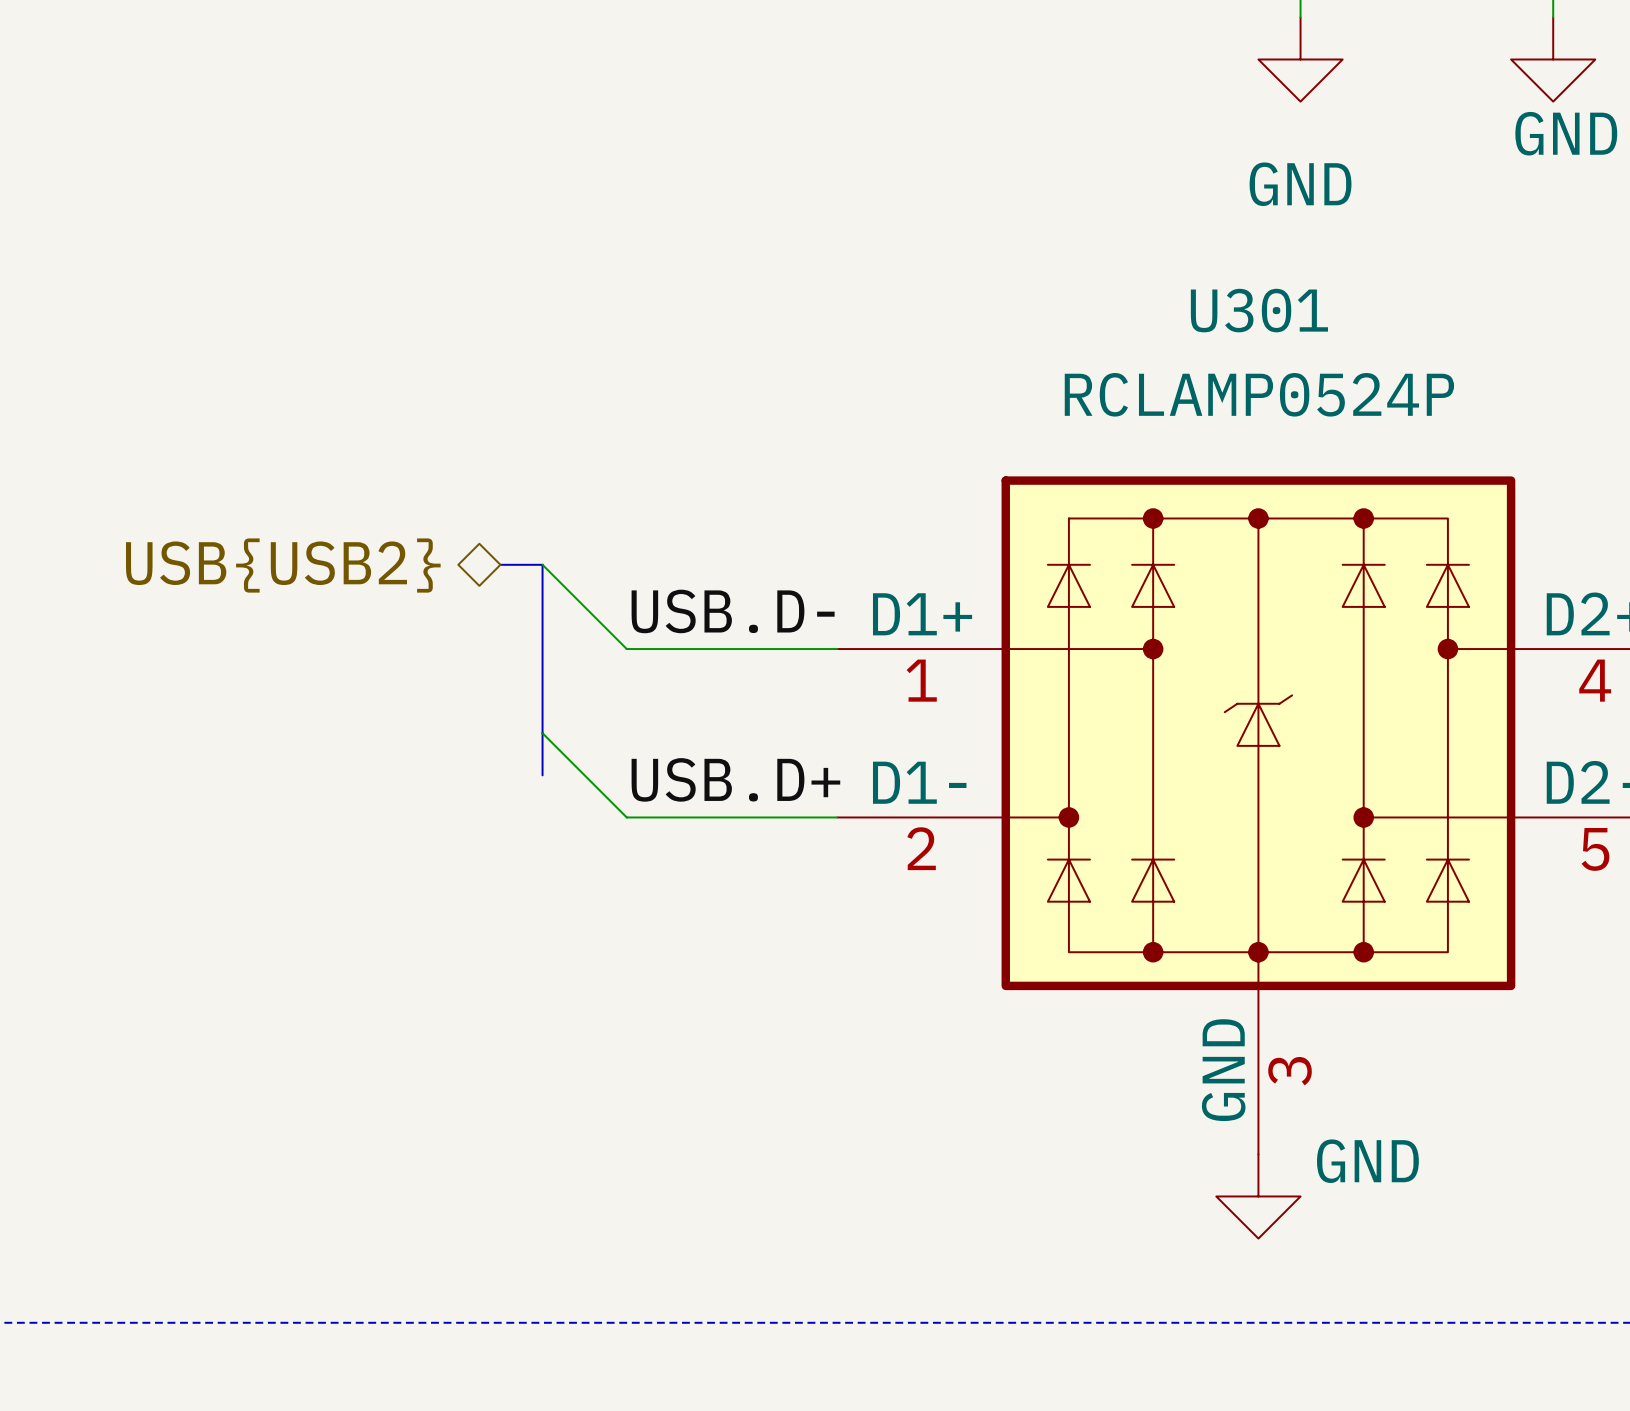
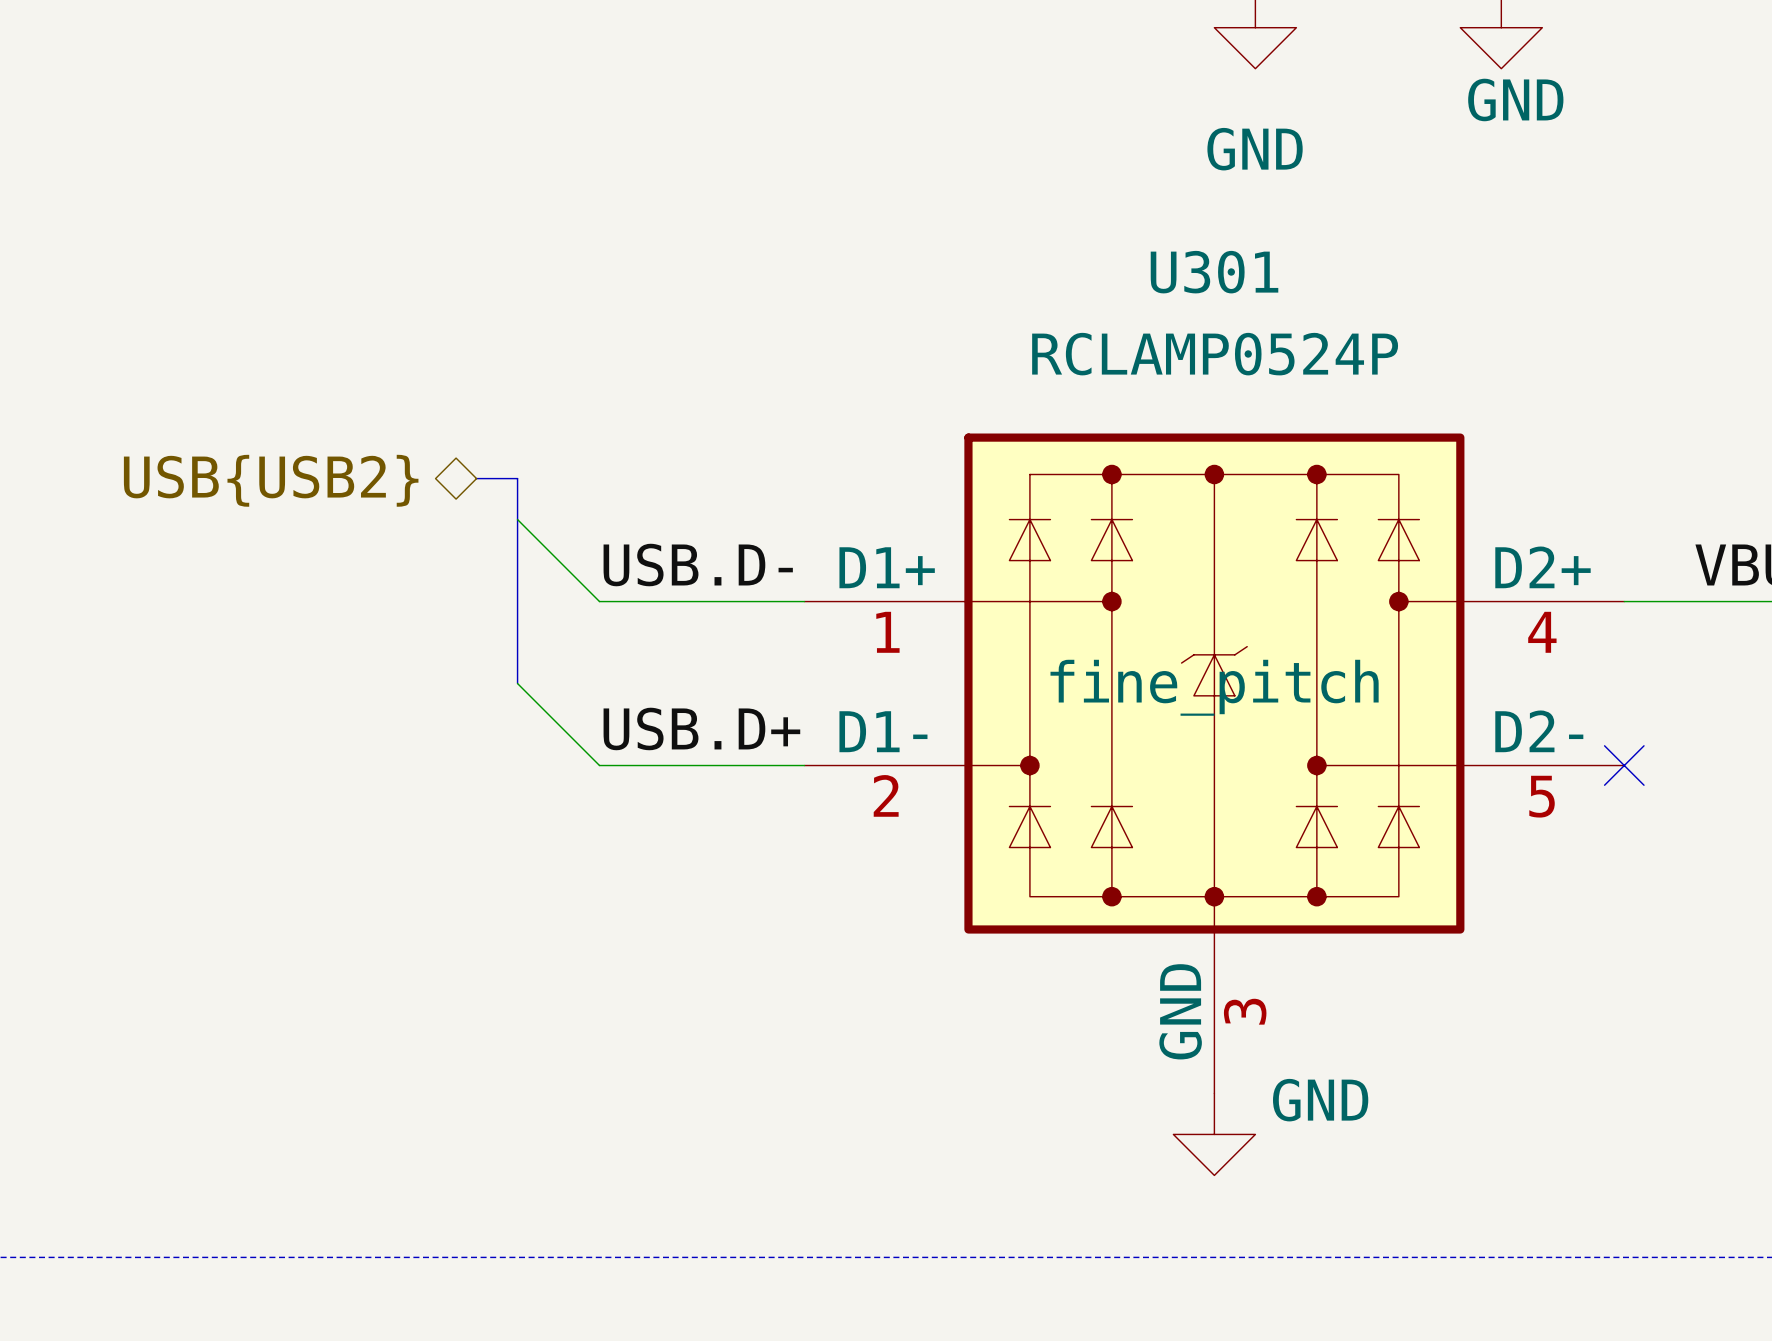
bus: (500, 564) (542, 564) -> (476, 478) (517, 478) (517, 519)
hierarchical label position: USB{USB2} (283, 565) -> USB{USB2} (271, 480)
bus: (542, 733) (542, 775) -> none
U301 text: none -> fine_pitch (1214, 687)

